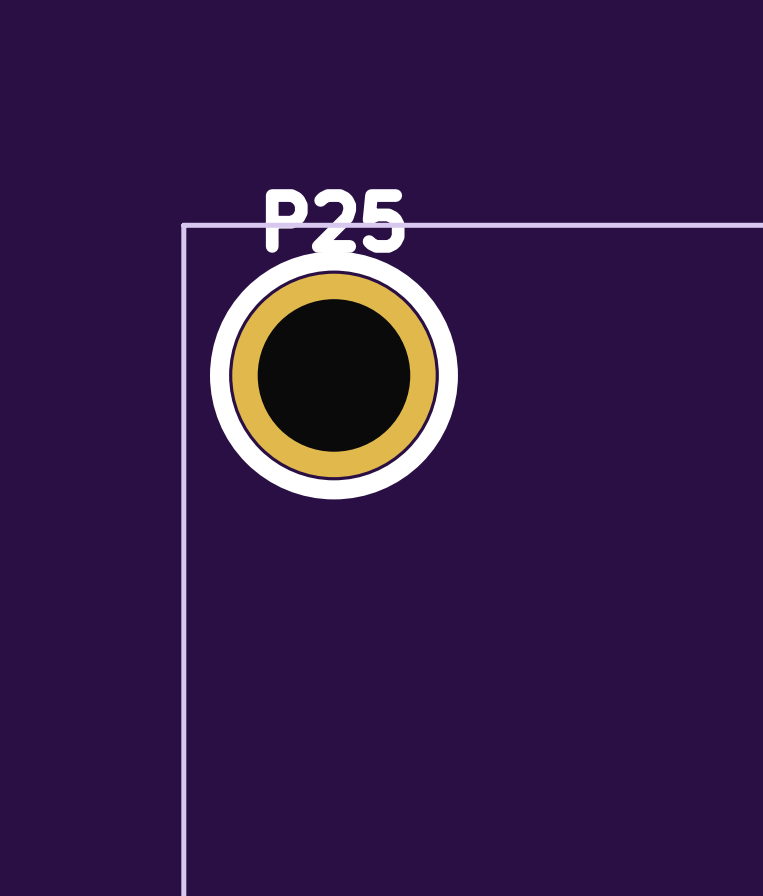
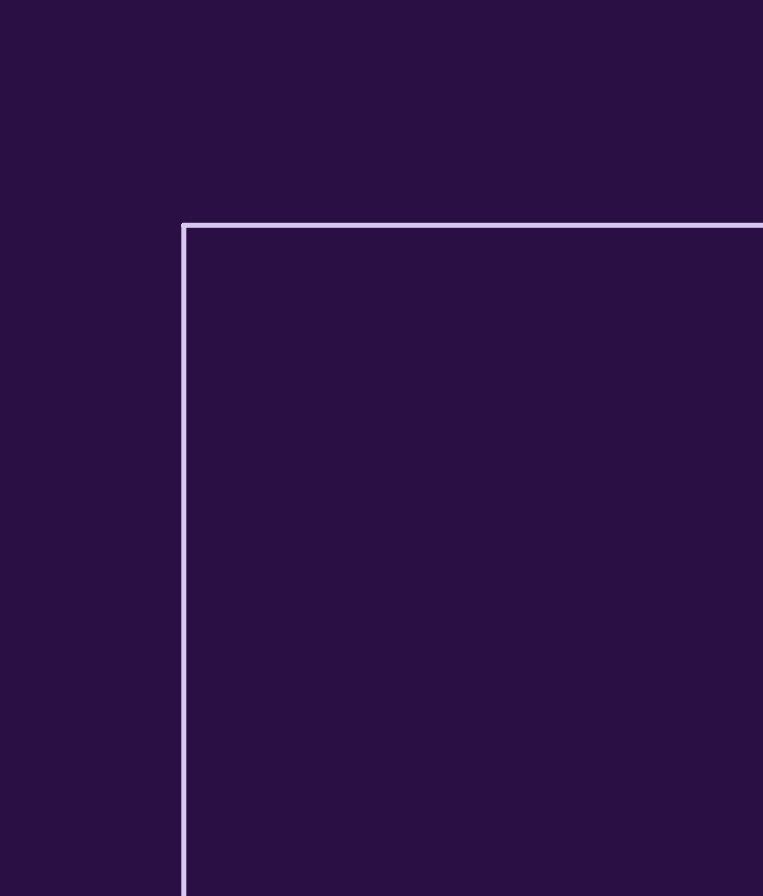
P25: (333, 375) -> none

